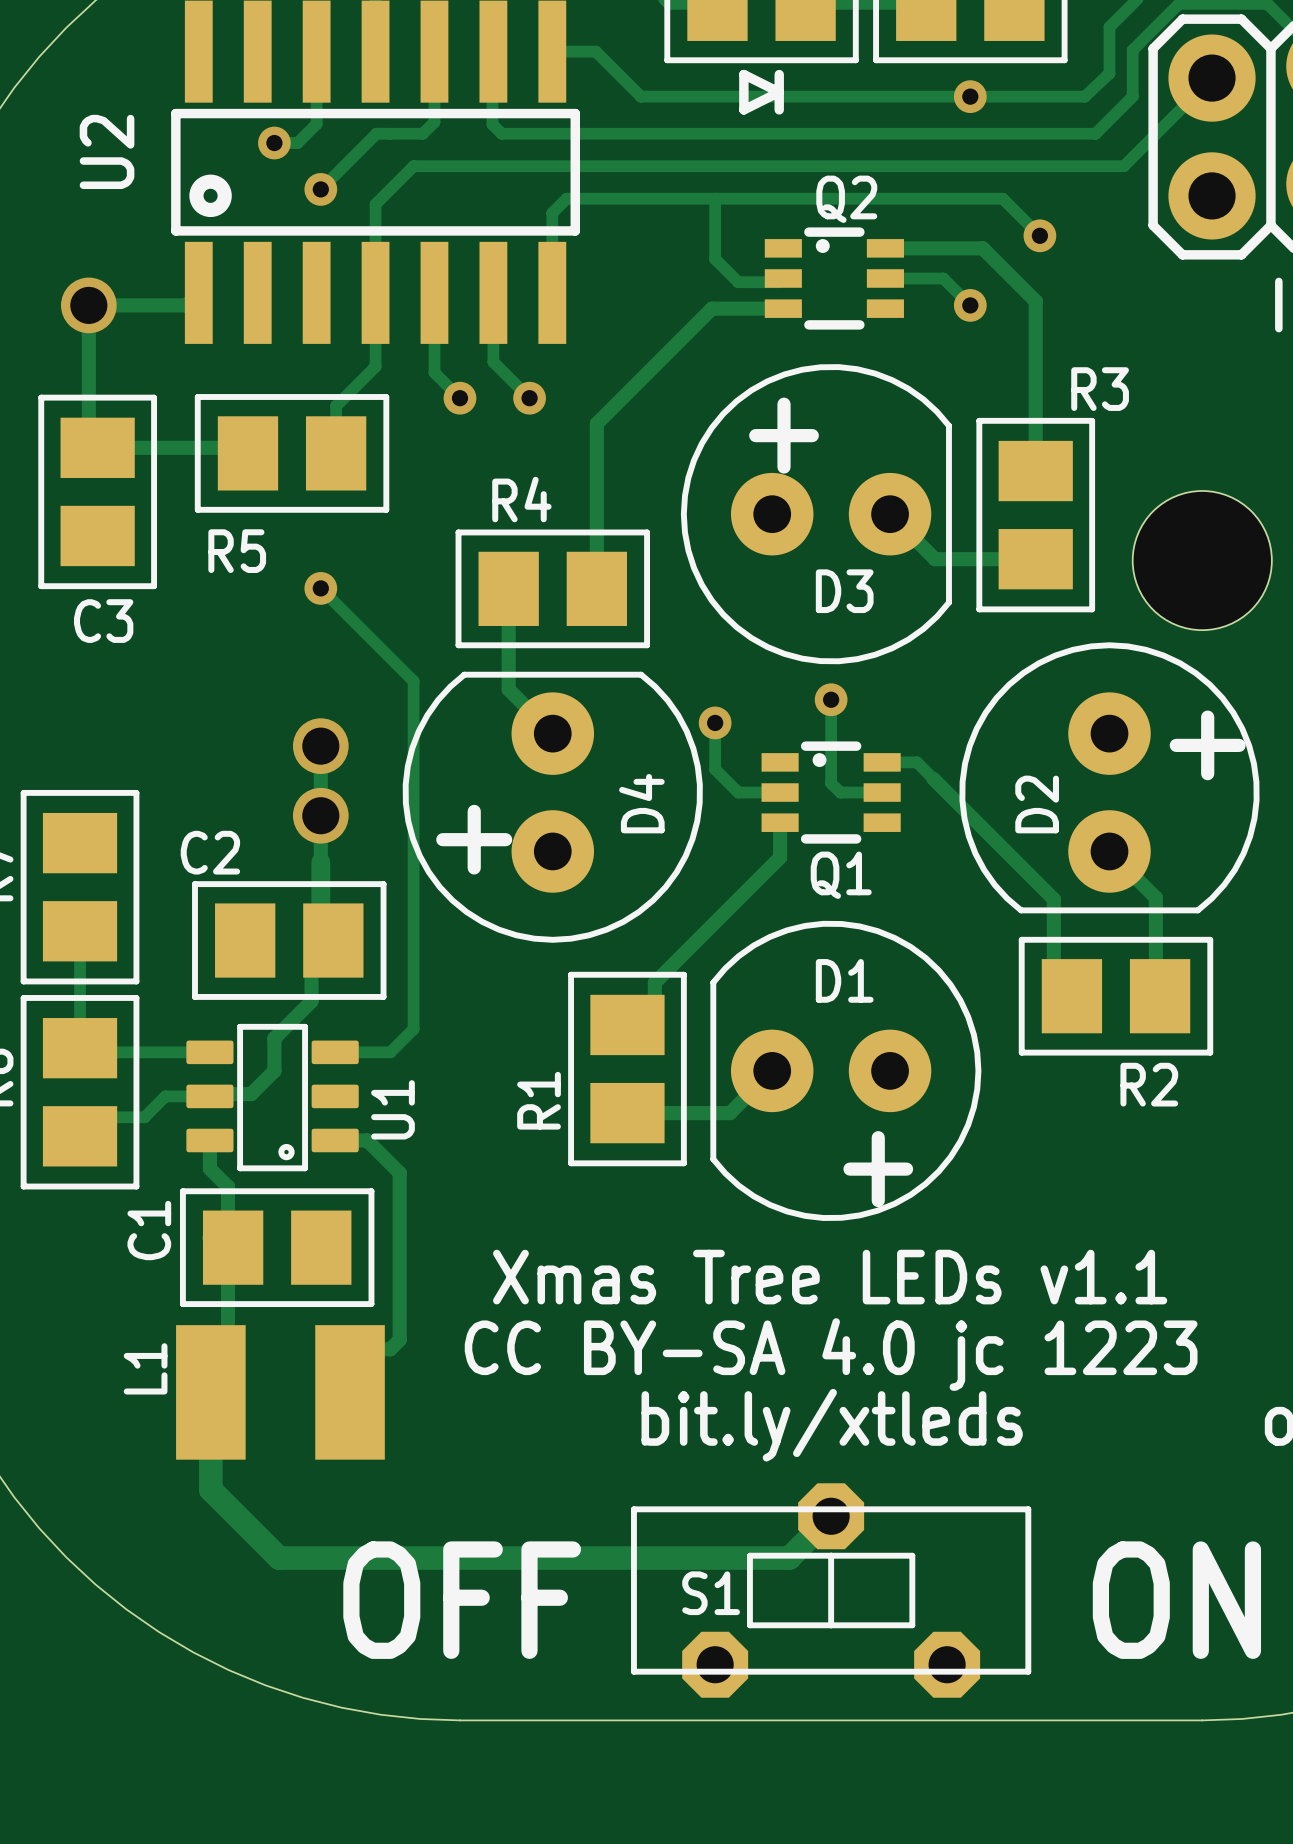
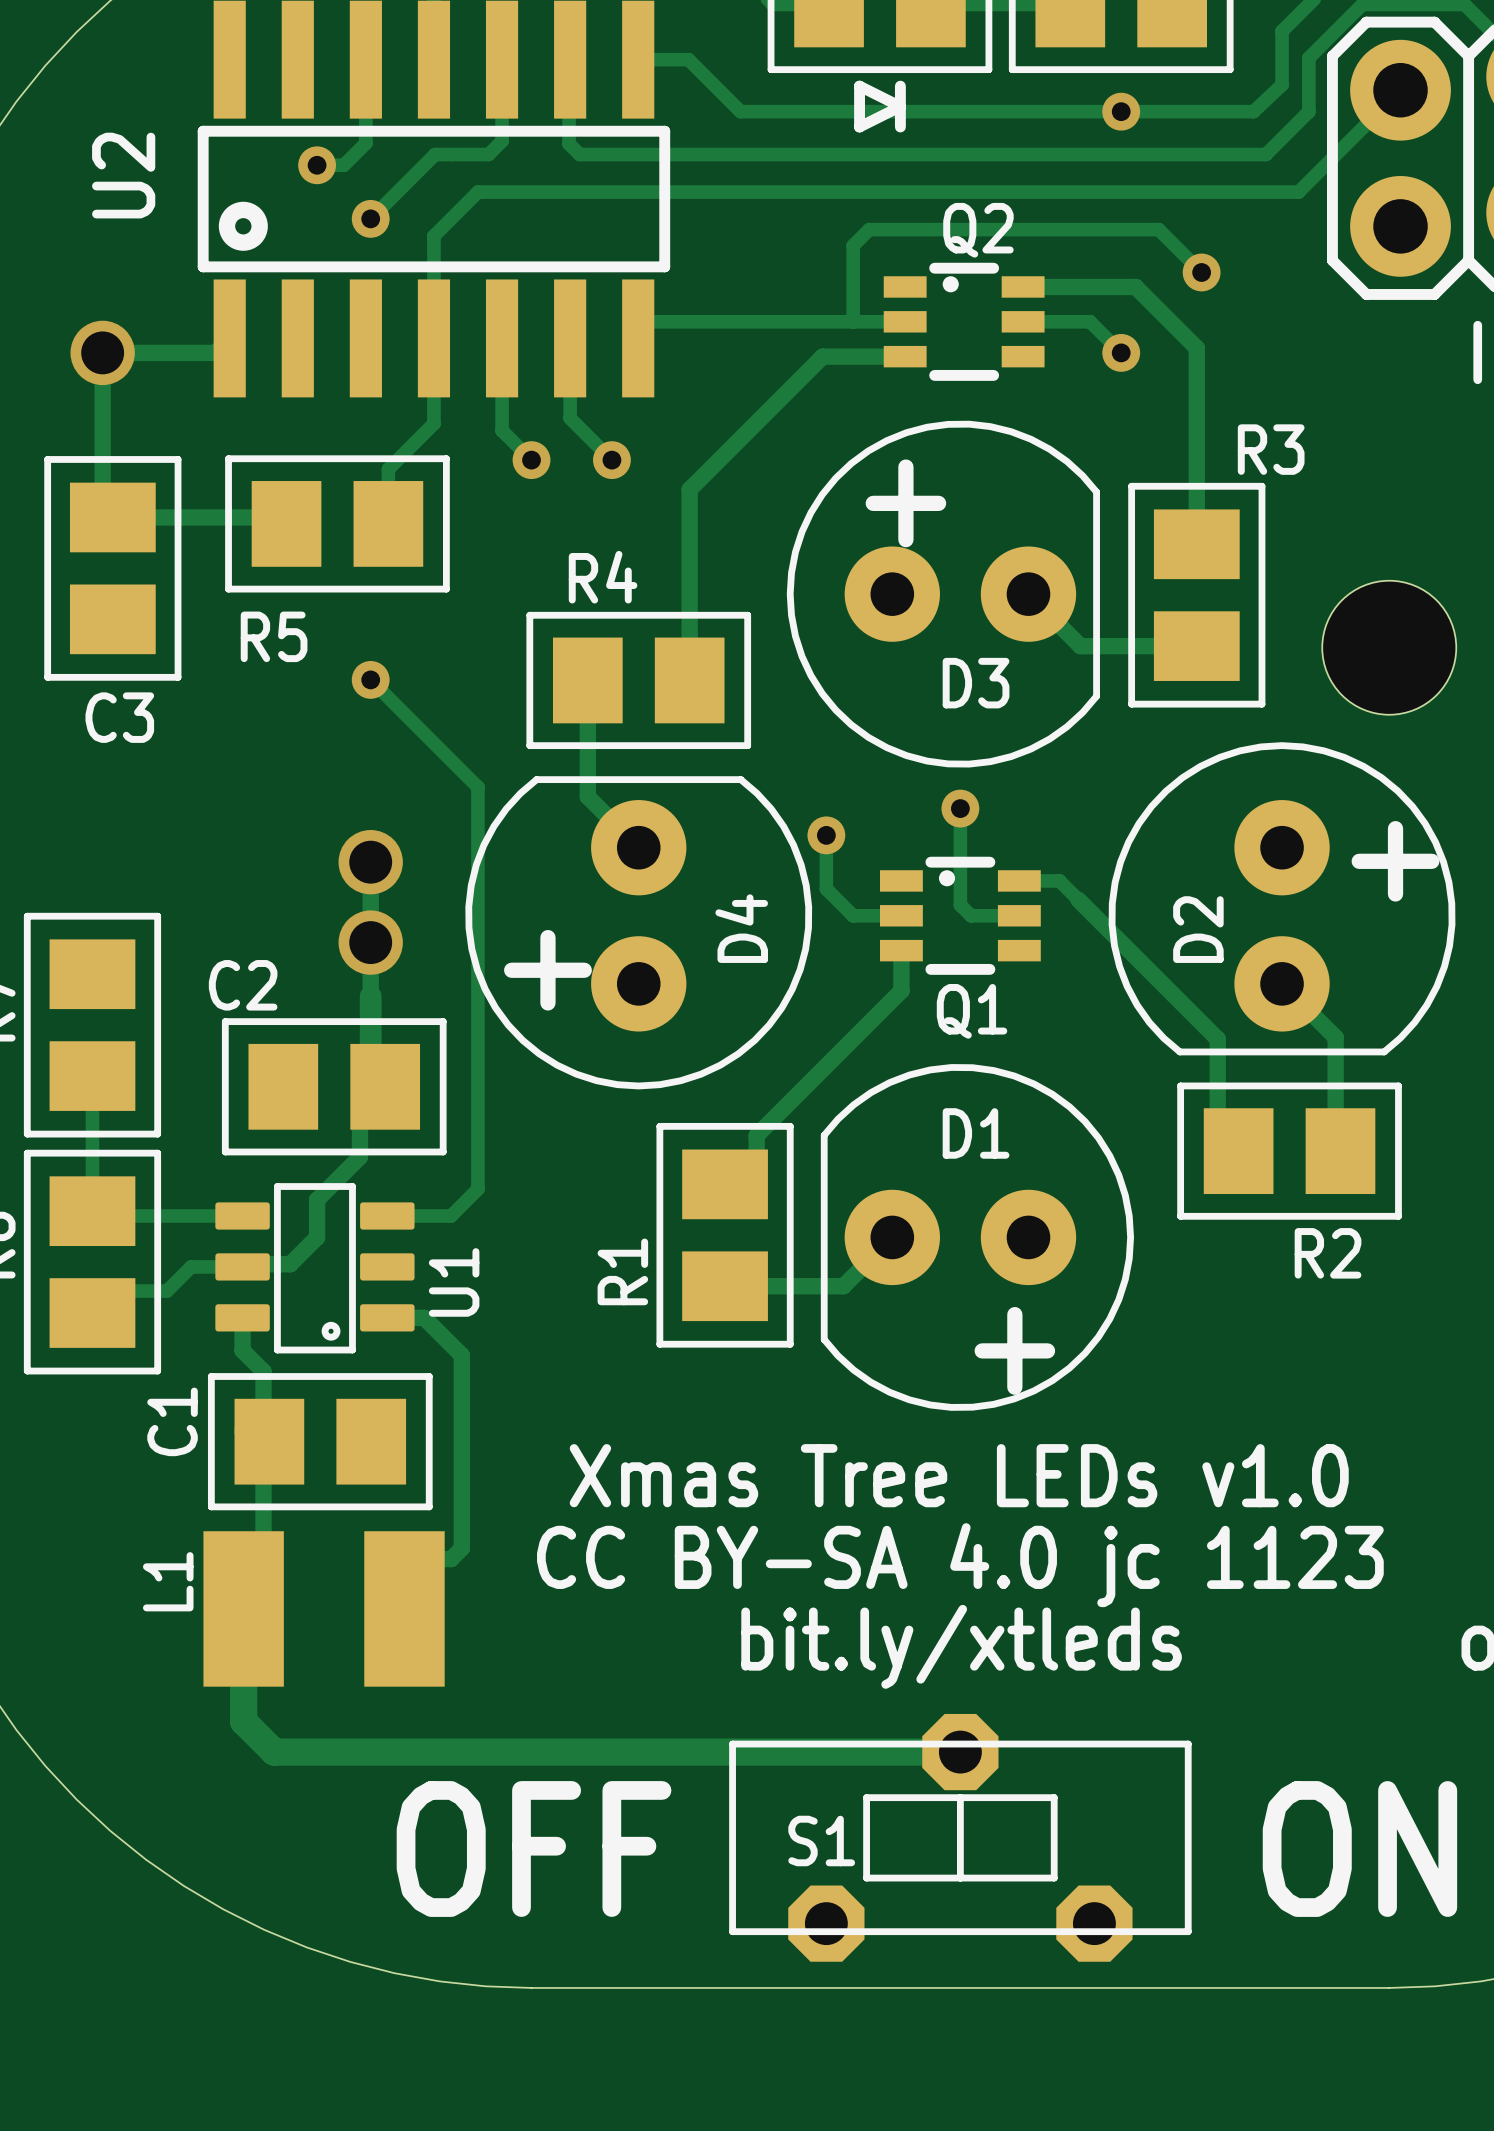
track: (715, 198) (715, 259) (738, 282) (779, 282) (783, 278) -> none
track: (752, 198) (566, 198) (552, 213) (552, 278) -> (905, 321) (638, 321)
track: none -> (869, 229) (853, 245) (853, 321)
hole size: [1132, 490, 1272, 631] -> [1322, 580, 1457, 715]
text: Xmas Tree LEDs v1.1 (830, 1277) -> Xmas Tree LEDs v1.0 (959, 1475)
text: CC BY-SA 4.0 jc 1223 (831, 1354) -> CC BY-SA 4.0 jc 1123 (960, 1565)
track: (237, 1516) (279, 1558) (789, 1558) (831, 1516) -> (274, 1752) (960, 1752)

